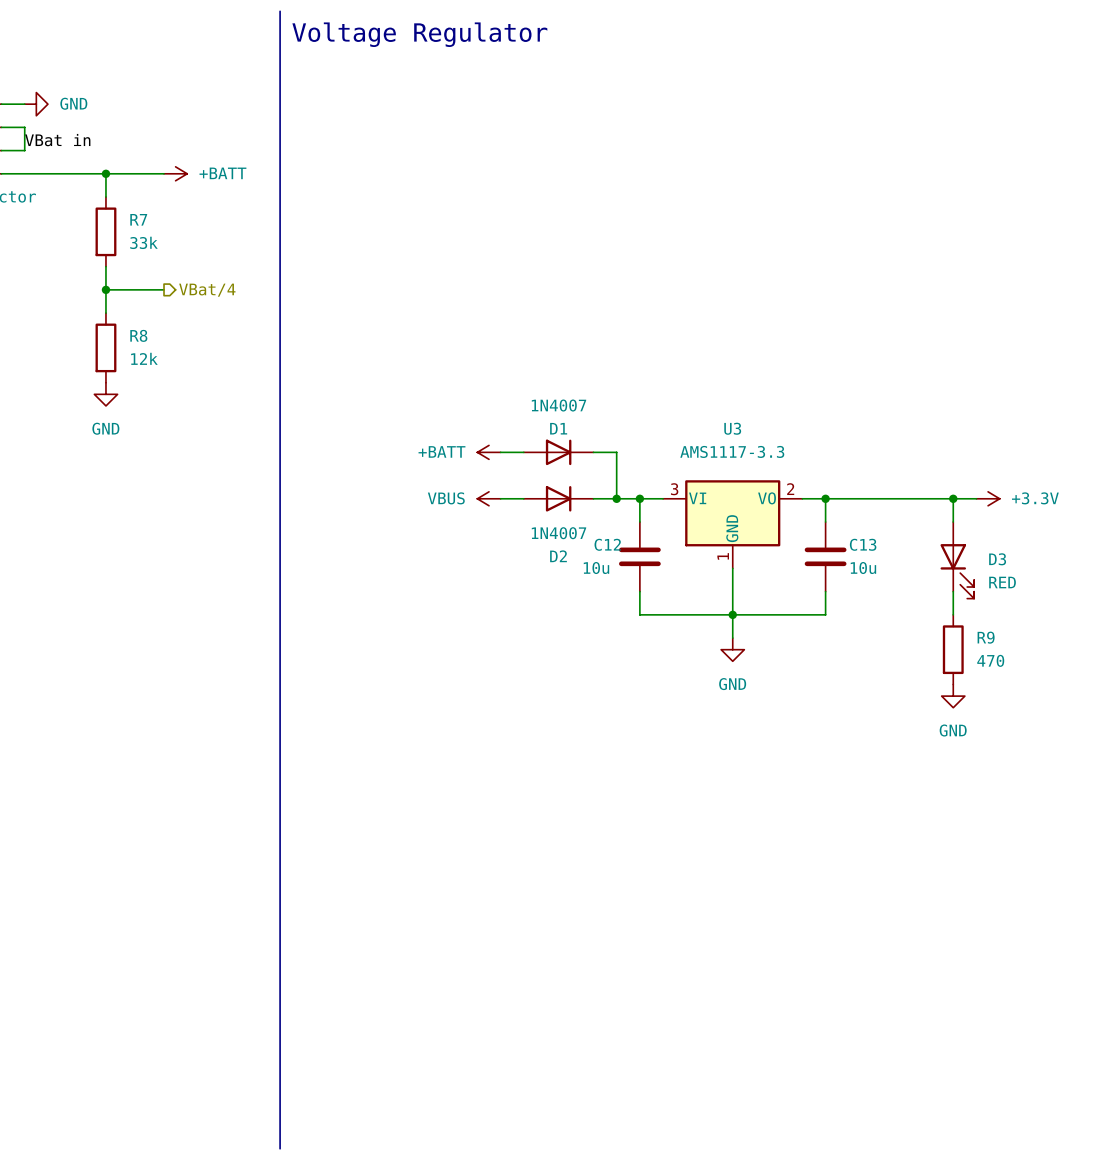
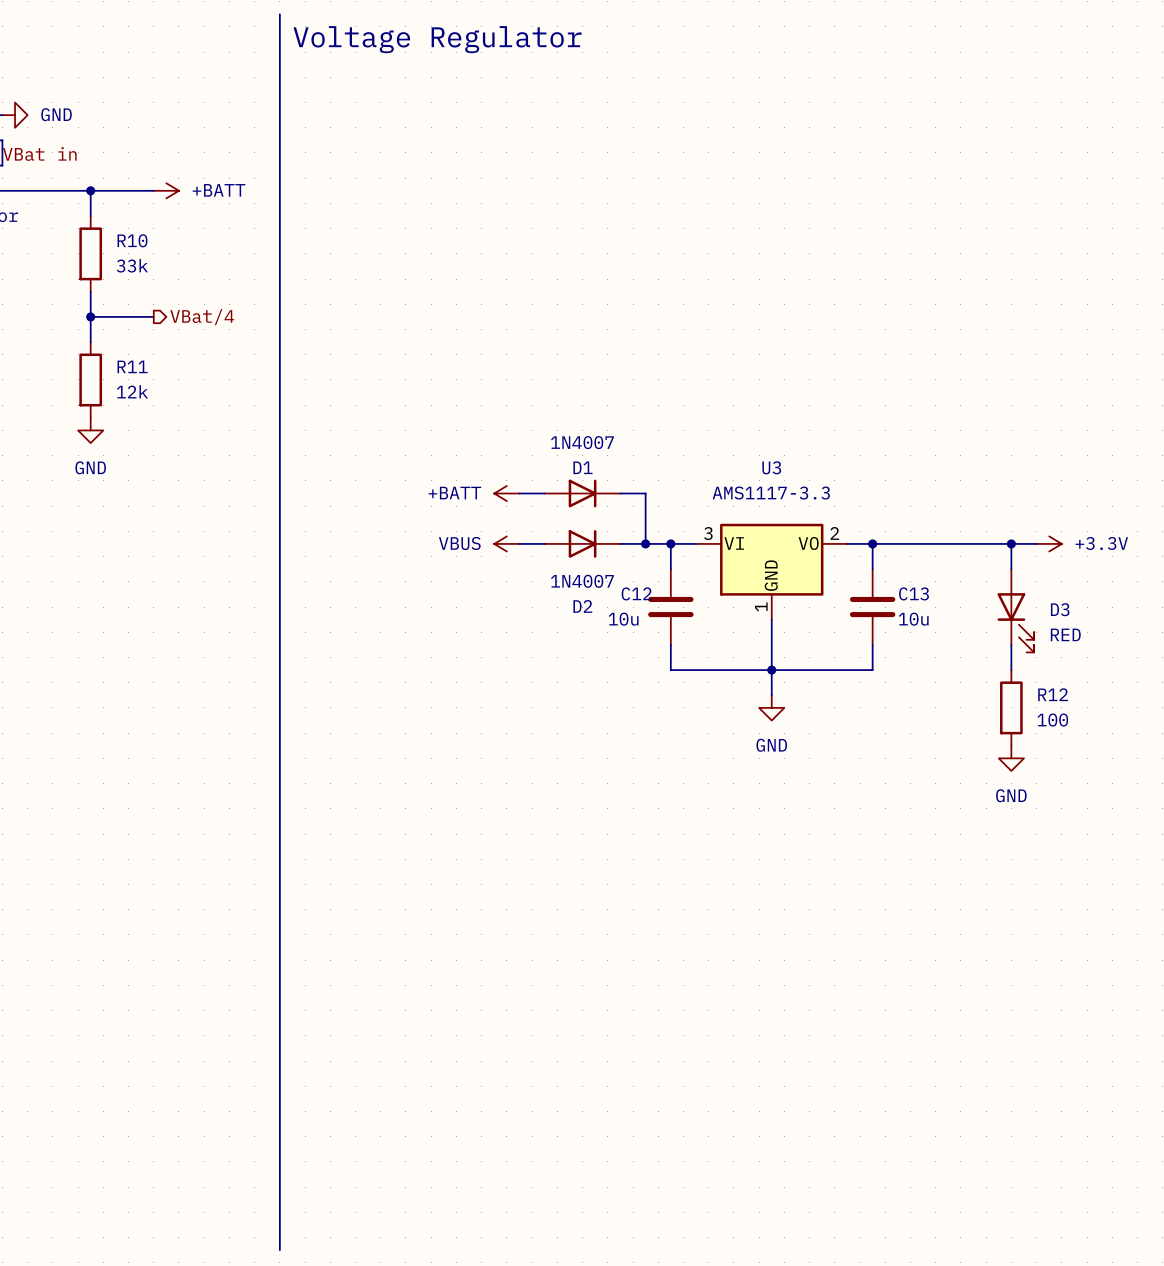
R7 name: R7 (138, 219) -> R10 (132, 240)
R8 name: R8 (138, 335) -> R11 (132, 366)
R9 name: R9 (986, 637) -> R12 (1053, 694)
R9 value: 470 (990, 660) -> 100 (1052, 720)

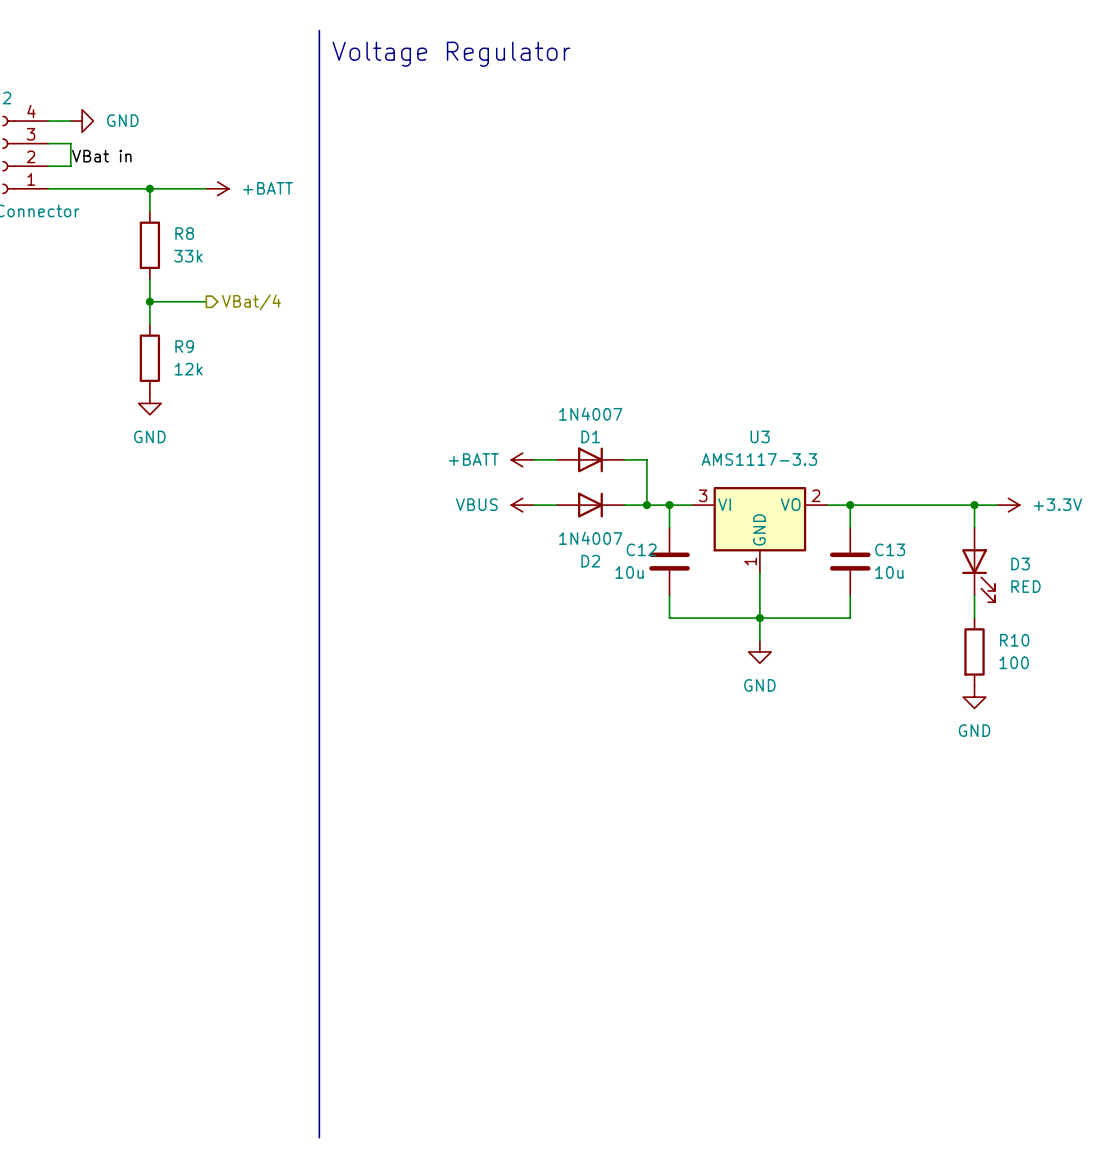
R10 name: R10 (132, 240) -> R8 (184, 233)
R11 name: R11 (132, 366) -> R9 (184, 346)
R12 name: R12 (1053, 694) -> R10 (1014, 640)

